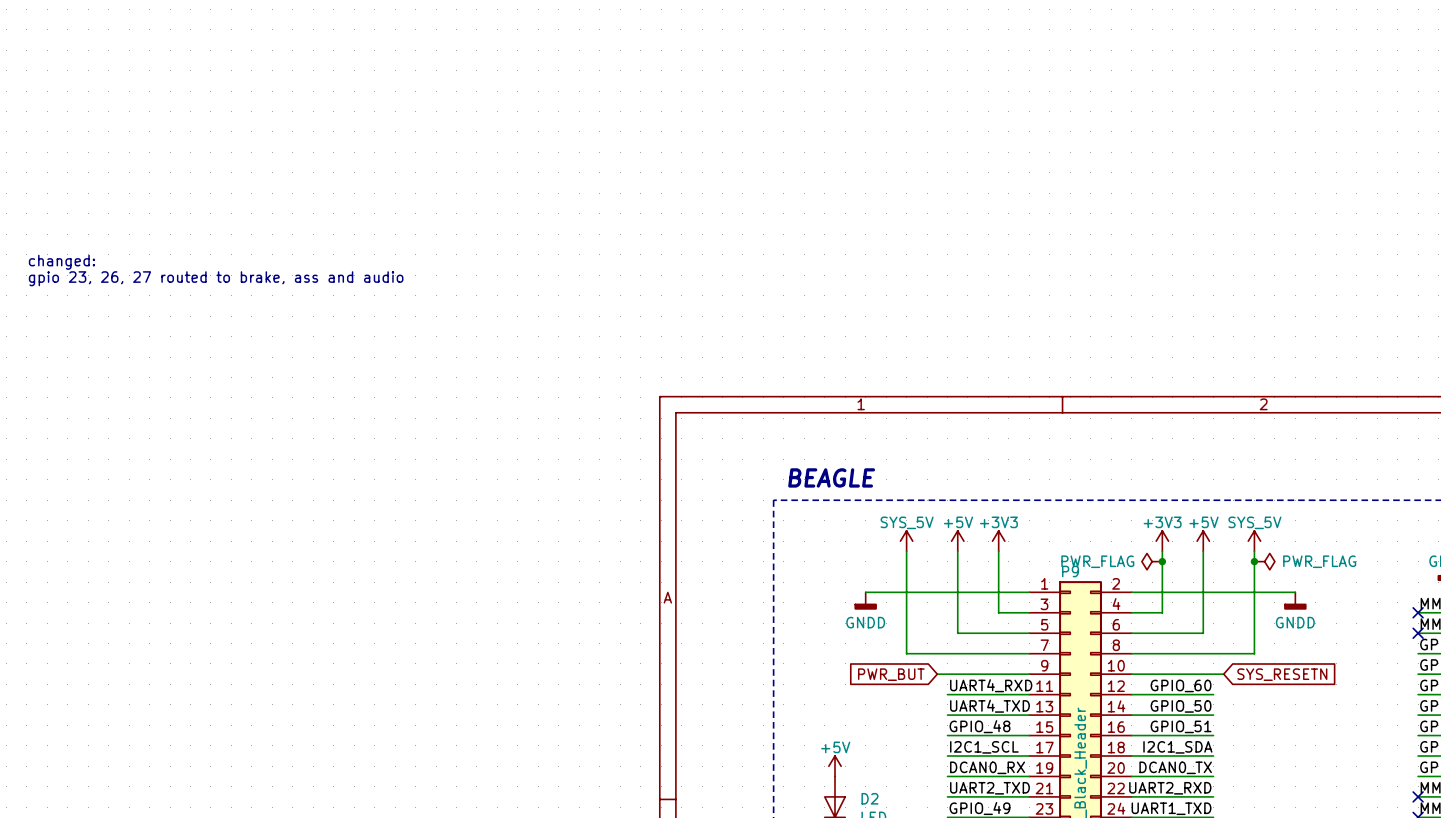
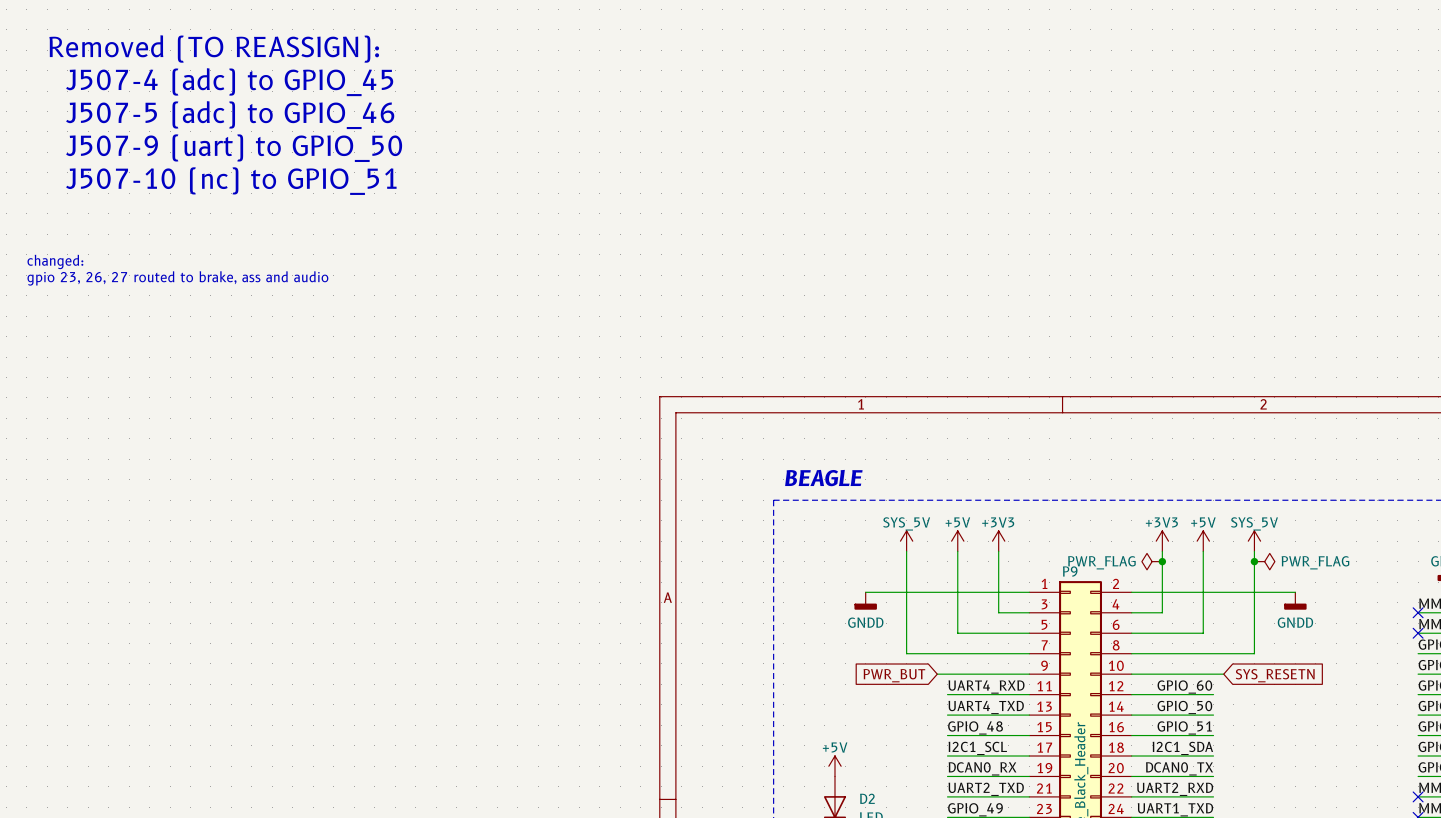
text: none -> Removed (TO REASSIGN): (214, 48)
text: none -> J507-4 (adc) to GPIO_45 (229, 82)
text: none -> J507-5 (adc) to GPIO_46 (230, 115)
text: none -> J507-9 (uart) to GPIO_50 (234, 148)
text: none -> J507-10 (nc) to GPIO_51 (231, 181)

